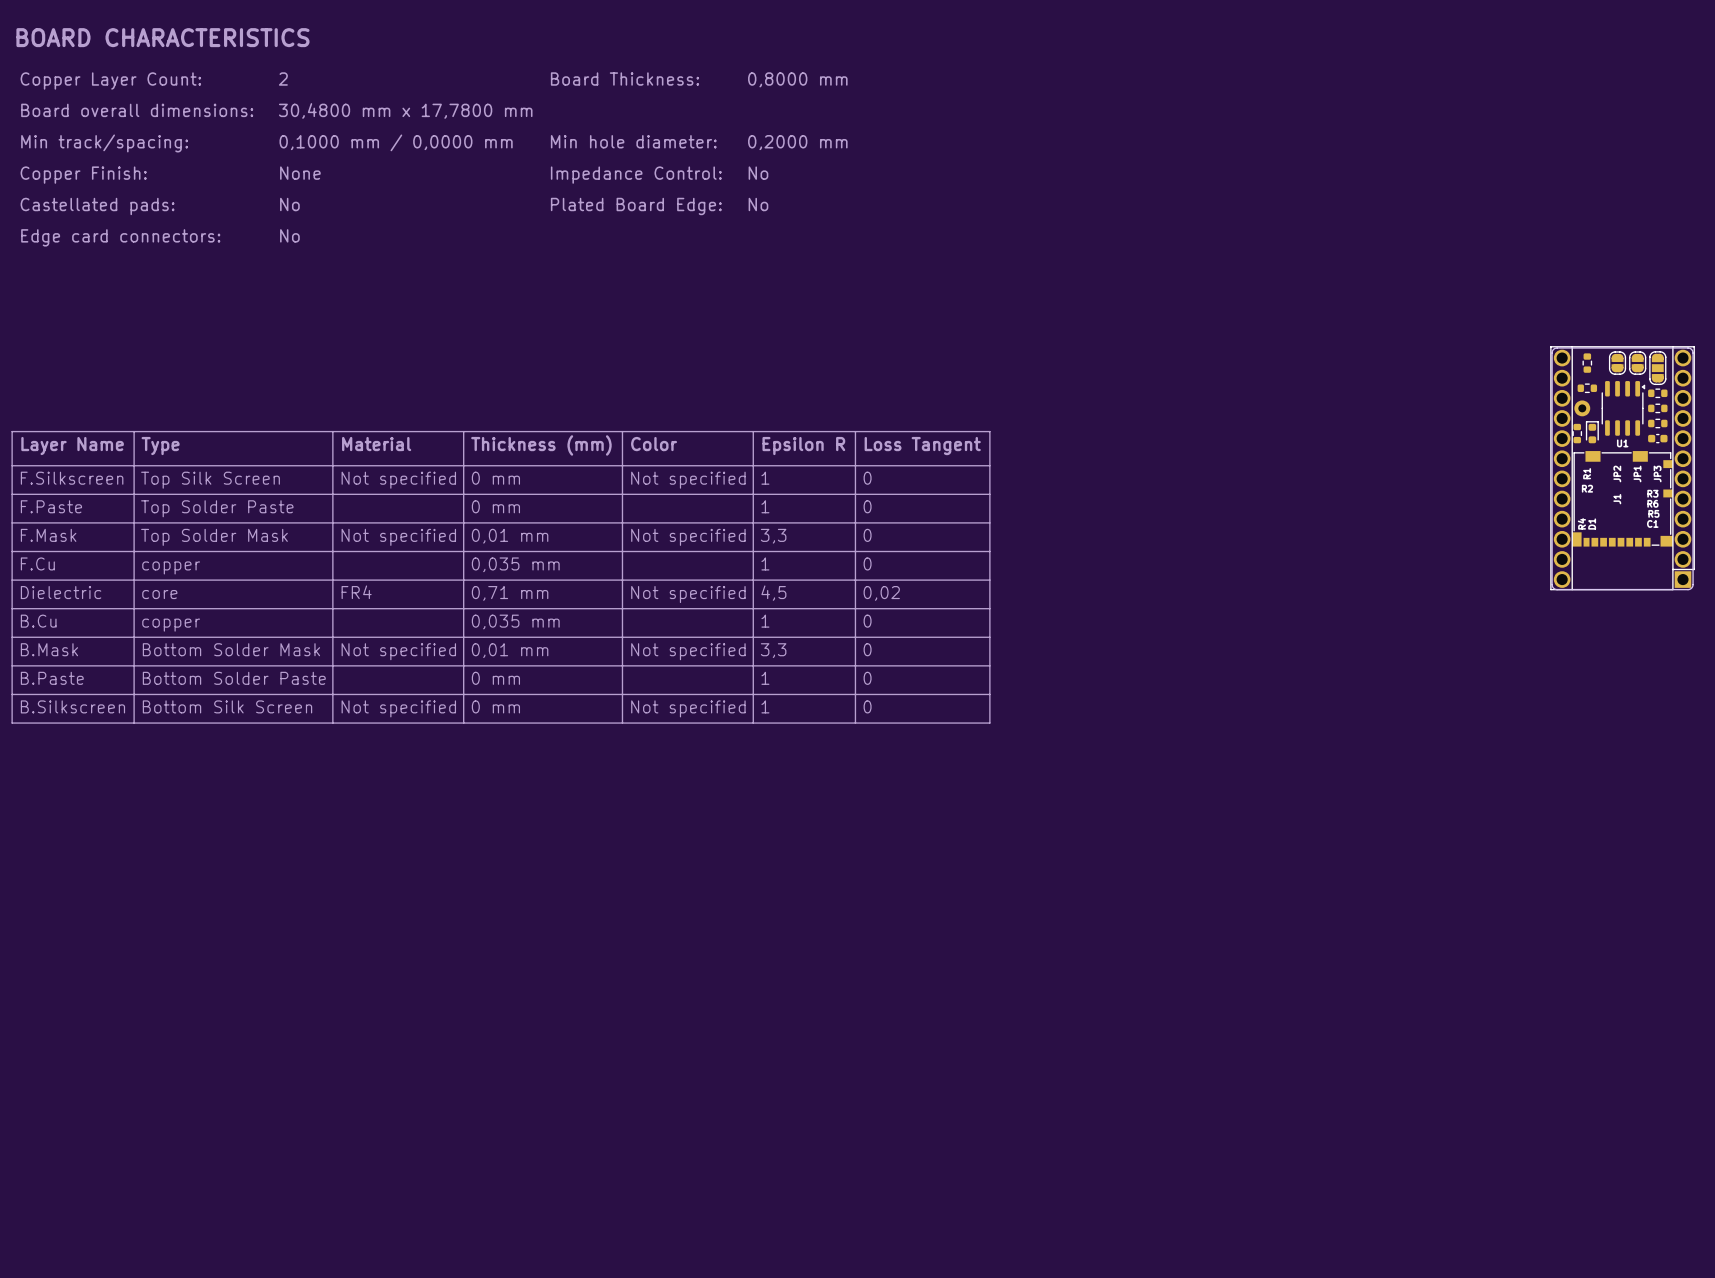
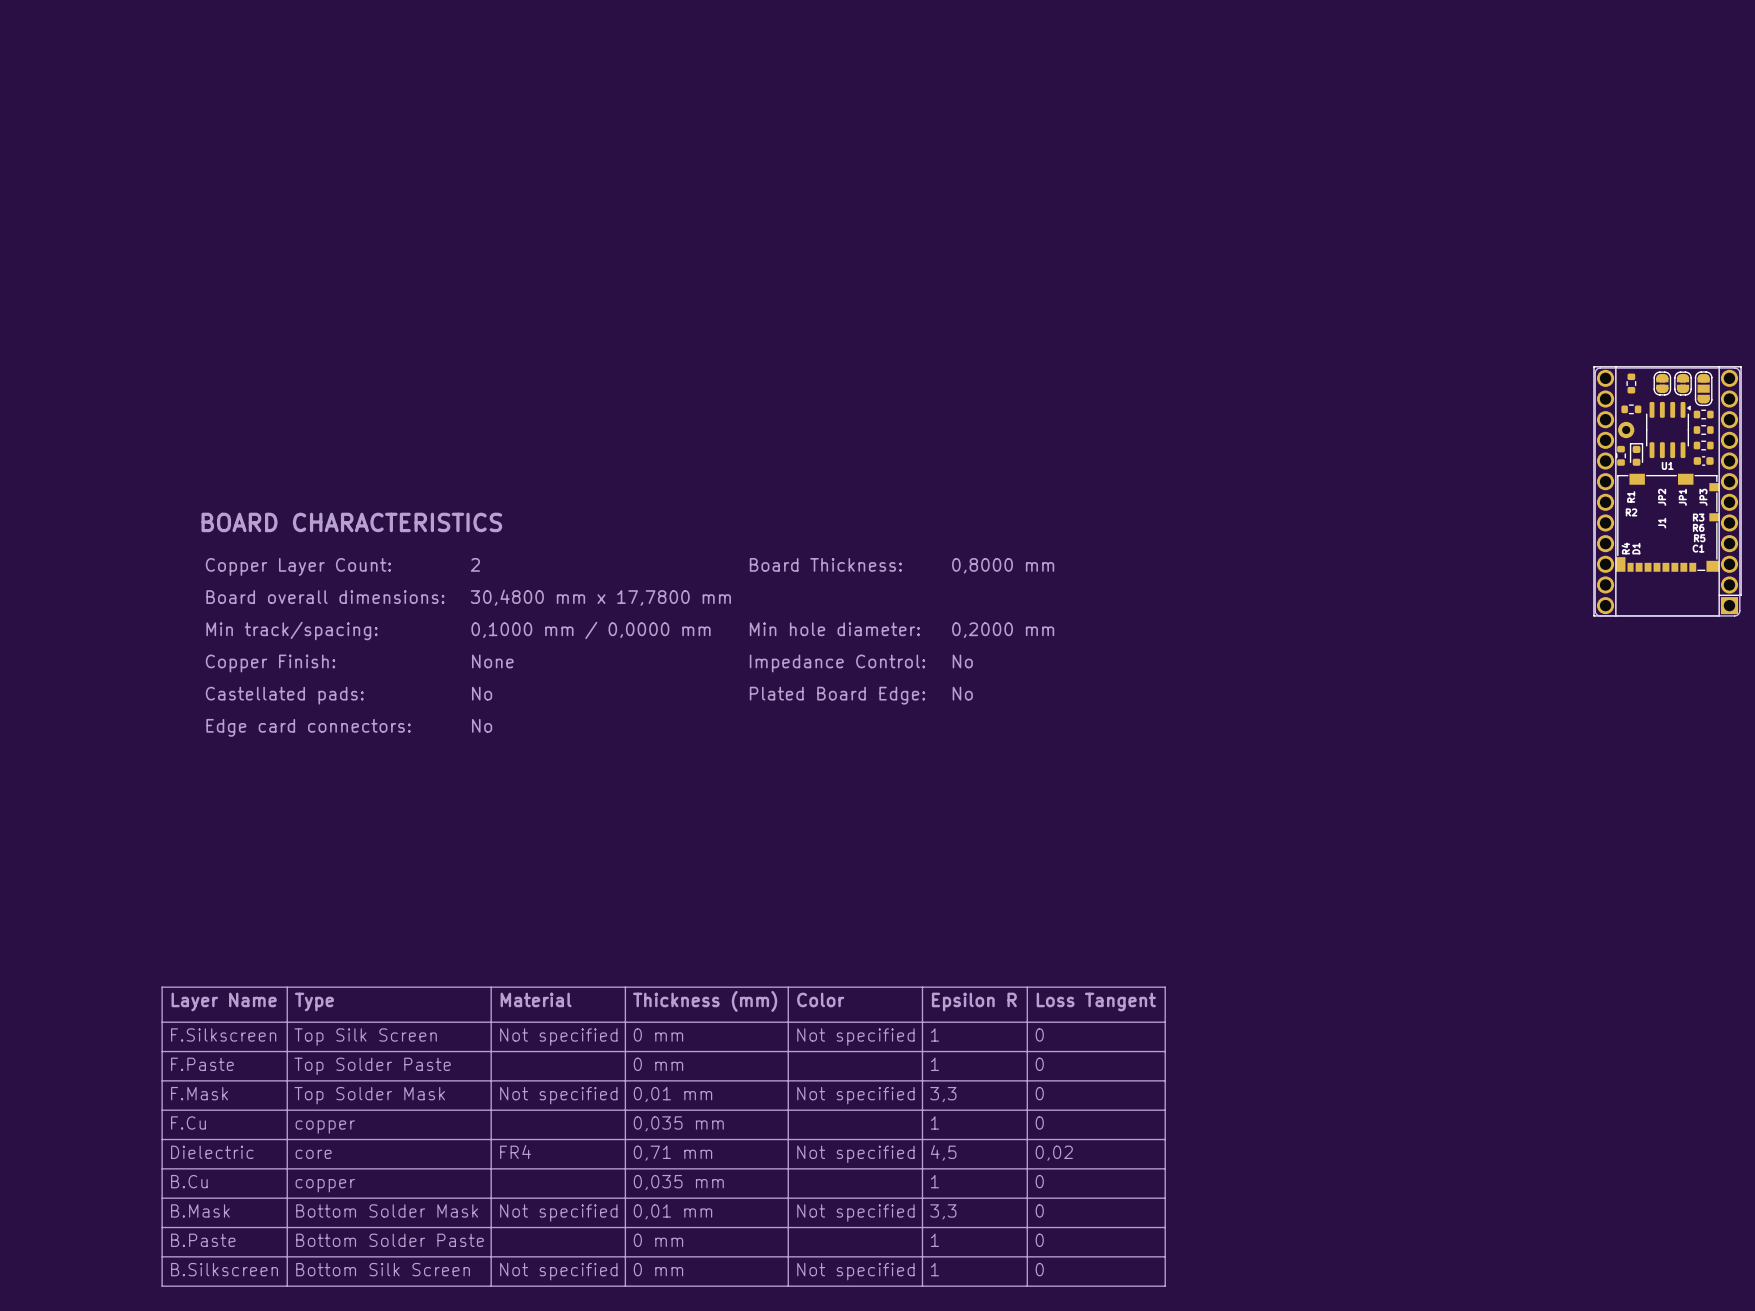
text: BOARD CHARACTERISTICS (162, 37) -> none
text: 2 (283, 79) -> none
text: Board Thickness: (624, 79) -> none
text: 0,8000 mm (797, 79) -> none
text: Copper Layer Count: (110, 80) -> none
text: Board overall dimensions: (137, 110) -> none
text: 30,4800 mm x 17,7800 mm (405, 110) -> none
text: Min hole diameter: (633, 141) -> none
text: 0,1000 mm / 0,0000 mm (396, 142) -> none
text: 0,2000 mm (797, 142) -> none
text: Min track/spacing: (104, 143) -> none
text: None (300, 173) -> none
text: No (758, 173) -> none
text: Copper Finish: (83, 175) -> none
text: Impedance Control: (636, 175) -> none
text: No (289, 204) -> none
text: No (758, 204) -> none
text: Castellated pads: (97, 206) -> none
text: Plated Board Edge: (636, 206) -> none
text: No (289, 235) -> none
text: Edge card connectors: (120, 237) -> none
line: (12, 431) (12, 723) (989, 723) (989, 431) (12, 431) -> none
line: (134, 431) (134, 723) -> none
line: (332, 431) (332, 723) -> none
line: (463, 431) (463, 723) -> none
line: (622, 431) (622, 723) -> none
line: (753, 431) (753, 723) -> none
line: (855, 431) (855, 723) -> none
text: Material (376, 444) -> none
text: Color (654, 444) -> none
text: Thickness (mm) (541, 445) -> none
text: Layer Name (72, 446) -> none
text: Type (160, 446) -> none
text: Epsilon R (803, 446) -> none
text: Loss Tangent (922, 446) -> none
line: (12, 465) (989, 465) -> none
text: F.Silkscreen (72, 478) -> none
text: 0 mm (495, 478) -> none
text: 1 (765, 478) -> none
text: 0 (867, 478) -> none
text: Top Silk Screen (210, 480) -> none
text: Not specified (398, 480) -> none
text: Not specified (688, 480) -> none
line: (12, 494) (989, 494) -> none
text: none -> BOARD CHARACTERISTICS (351, 522)
text: F.Paste (51, 506) -> none
text: 0 mm (495, 506) -> none
text: 1 (765, 506) -> none
text: 0 (867, 506) -> none
text: Top Solder Paste (217, 508) -> none
line: (12, 522) (989, 522) -> none
text: F.Mask (48, 535) -> none
text: 0 (867, 535) -> none
text: 0,01 mm (510, 536) -> none
text: 3,3 (773, 536) -> none
text: Top Solder Mask (214, 537) -> none
text: Not specified (398, 537) -> none
text: Not specified (688, 537) -> none
text: none -> 2 (475, 564)
text: none -> Board Thickness: (825, 564)
text: none -> 0,8000 mm (1003, 565)
text: none -> Copper Layer Count: (298, 566)
line: (12, 551) (989, 551) -> none
text: F.Cu (37, 563) -> none
text: 1 (765, 563) -> none
text: 0 (867, 563) -> none
text: 0,035 mm (515, 564) -> none
text: copper (171, 567) -> none
text: none -> Board overall dimensions: (325, 597)
text: none -> 30,4800 mm x 17,7800 mm (600, 597)
line: (12, 580) (989, 580) -> none
text: Dielectric (61, 592) -> none
text: FR4 (356, 592) -> none
text: 0,71 mm (510, 593) -> none
text: 4,5 (773, 593) -> none
text: 0,02 (881, 593) -> none
text: core (159, 594) -> none
text: Not specified (688, 594) -> none
text: none -> Min hole diameter: (834, 629)
text: none -> 0,1000 mm / 0,0000 mm (591, 630)
text: none -> 0,2000 mm (1003, 630)
text: none -> Min track/spacing: (291, 631)
line: (12, 608) (989, 608) -> none
text: B.Cu (38, 621) -> none
text: 0,035 mm (515, 621) -> none
text: 1 (765, 621) -> none
text: 0 (867, 621) -> none
text: copper (171, 625) -> none
text: none -> None (492, 661)
text: none -> No (962, 661)
text: none -> Copper Finish: (270, 663)
text: none -> Impedance Control: (837, 663)
line: (12, 637) (989, 637) -> none
text: B.Mask (49, 649) -> none
text: Bottom Solder Mask (231, 649) -> none
text: 0 (867, 649) -> none
text: 0,01 mm (510, 650) -> none
text: 3,3 (773, 650) -> none
text: Not specified (398, 651) -> none
text: Not specified (688, 651) -> none
line: (12, 665) (989, 665) -> none
text: none -> No (482, 693)
text: none -> No (962, 693)
text: none -> Castellated pads: (284, 695)
text: none -> Plated Board Edge: (837, 695)
text: B.Paste (52, 678) -> none
text: Bottom Solder Paste (234, 678) -> none
text: 0 mm (495, 678) -> none
text: 1 (765, 678) -> none
text: 0 (867, 678) -> none
line: (12, 694) (989, 694) -> none
text: none -> No (482, 725)
text: none -> Edge card connectors: (308, 727)
text: B.Silkscreen (72, 706) -> none
text: Bottom Silk Screen (227, 706) -> none
text: 0 mm (495, 706) -> none
text: 1 (765, 706) -> none
text: 0 (867, 706) -> none
text: Not specified (398, 708) -> none
text: Not specified (688, 708) -> none
line: none -> (162, 987) (162, 1286) (1165, 1286) (1165, 987) (162, 987)
line: none -> (287, 987) (287, 1286)
line: none -> (491, 987) (491, 1286)
line: none -> (625, 987) (625, 1286)
line: none -> (788, 987) (788, 1286)
line: none -> (922, 987) (922, 1286)
line: none -> (1027, 987) (1027, 1286)
text: none -> Material (536, 999)
text: none -> Color (820, 999)
text: none -> Layer Name (224, 1001)
text: none -> Type (314, 1001)
text: none -> Thickness (mm) (705, 1001)
text: none -> Epsilon R (974, 1001)
text: none -> Loss Tangent (1096, 1001)
line: none -> (162, 1022) (1165, 1022)
text: none -> F.Silkscreen (223, 1034)
text: none -> 0 mm (658, 1034)
text: none -> 1 (934, 1034)
text: none -> 0 (1039, 1034)
text: none -> Top Silk Screen (365, 1037)
text: none -> Not specified (558, 1037)
text: none -> Not specified (855, 1037)
line: none -> (162, 1051) (1165, 1051)
text: none -> F.Paste (202, 1064)
text: none -> 0 mm (658, 1064)
text: none -> 1 (934, 1064)
text: none -> 0 (1039, 1064)
text: none -> Top Solder Paste (372, 1066)
line: none -> (162, 1080) (1165, 1080)
text: none -> F.Mask (199, 1093)
text: none -> 0 (1039, 1093)
text: none -> 0,01 mm (672, 1094)
text: none -> 3,3 (943, 1094)
text: none -> Top Solder Mask (369, 1095)
text: none -> Not specified (558, 1095)
text: none -> Not specified (855, 1095)
line: none -> (162, 1110) (1165, 1110)
text: none -> F.Cu (188, 1122)
text: none -> 1 (934, 1122)
text: none -> 0 (1039, 1122)
text: none -> 0,035 mm (678, 1123)
text: none -> copper (325, 1127)
line: none -> (162, 1139) (1165, 1139)
text: none -> Dielectric (212, 1152)
text: none -> FR4 (515, 1152)
text: none -> 0,71 mm (672, 1153)
text: none -> 4,5 (943, 1152)
text: none -> 0,02 (1054, 1153)
text: none -> core (313, 1154)
text: none -> Not specified (855, 1154)
line: none -> (162, 1168) (1165, 1168)
text: none -> B.Cu (189, 1181)
text: none -> 0,035 mm (678, 1182)
text: none -> 1 (934, 1181)
text: none -> 0 (1039, 1181)
text: none -> copper (325, 1185)
line: none -> (162, 1198) (1165, 1198)
text: none -> B.Mask (200, 1210)
text: none -> Bottom Solder Mask (387, 1210)
text: none -> 0 (1039, 1210)
text: none -> 0,01 mm (672, 1211)
text: none -> 3,3 (943, 1211)
text: none -> Not specified (558, 1213)
text: none -> Not specified (855, 1213)
line: none -> (162, 1227) (1165, 1227)
text: none -> B.Paste (203, 1240)
text: none -> Bottom Solder Paste (390, 1240)
text: none -> 0 mm (658, 1240)
text: none -> 1 (934, 1240)
text: none -> 0 (1039, 1240)
line: none -> (162, 1256) (1165, 1256)
text: none -> B.Silkscreen (224, 1269)
text: none -> Bottom Silk Screen (383, 1269)
text: none -> 0 mm (658, 1269)
text: none -> 1 (934, 1269)
text: none -> 0 (1039, 1269)
text: none -> Not specified (558, 1271)
text: none -> Not specified (855, 1271)

